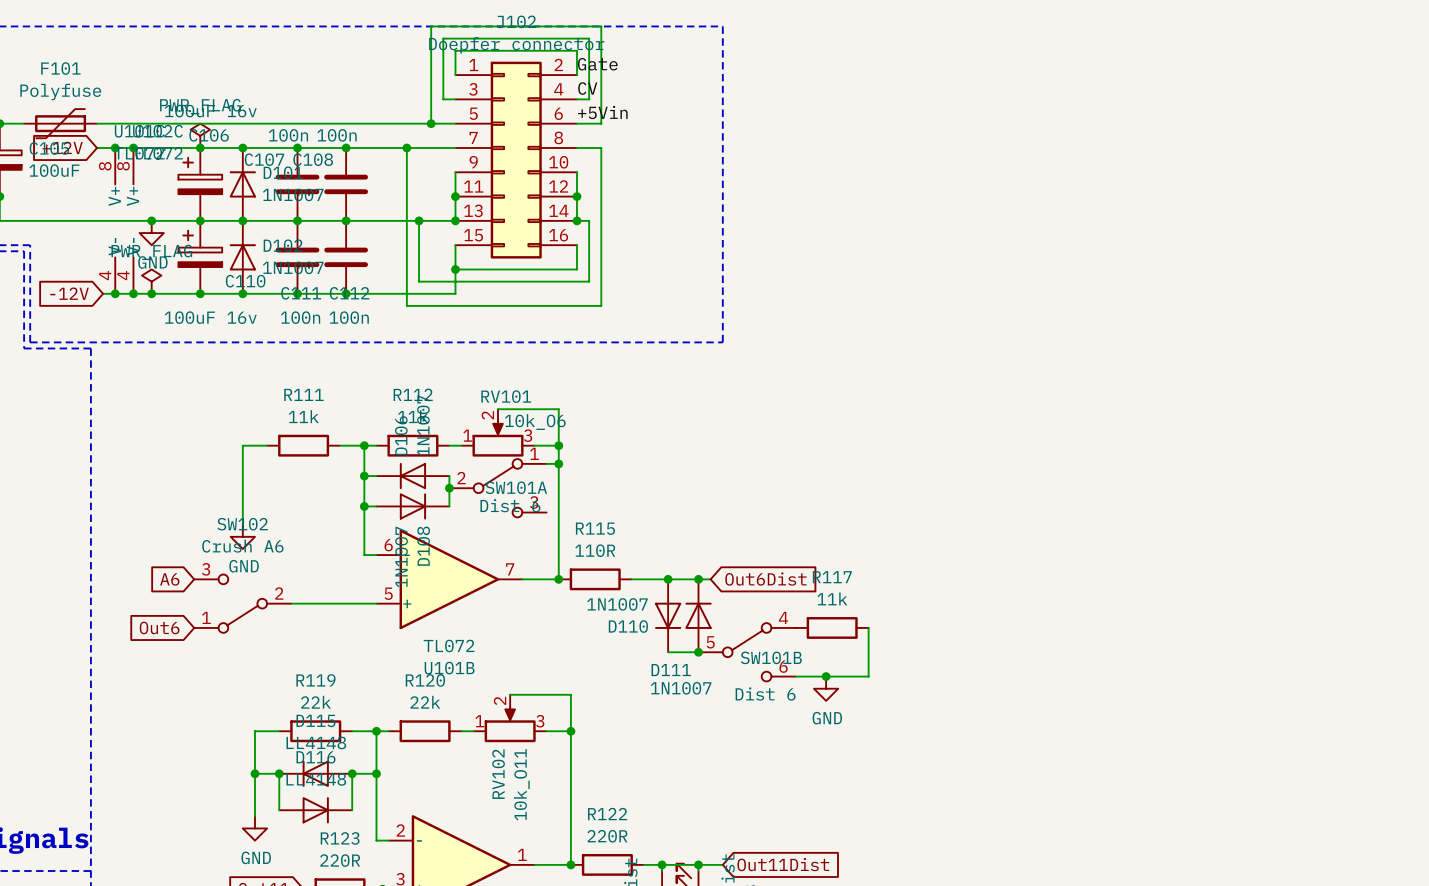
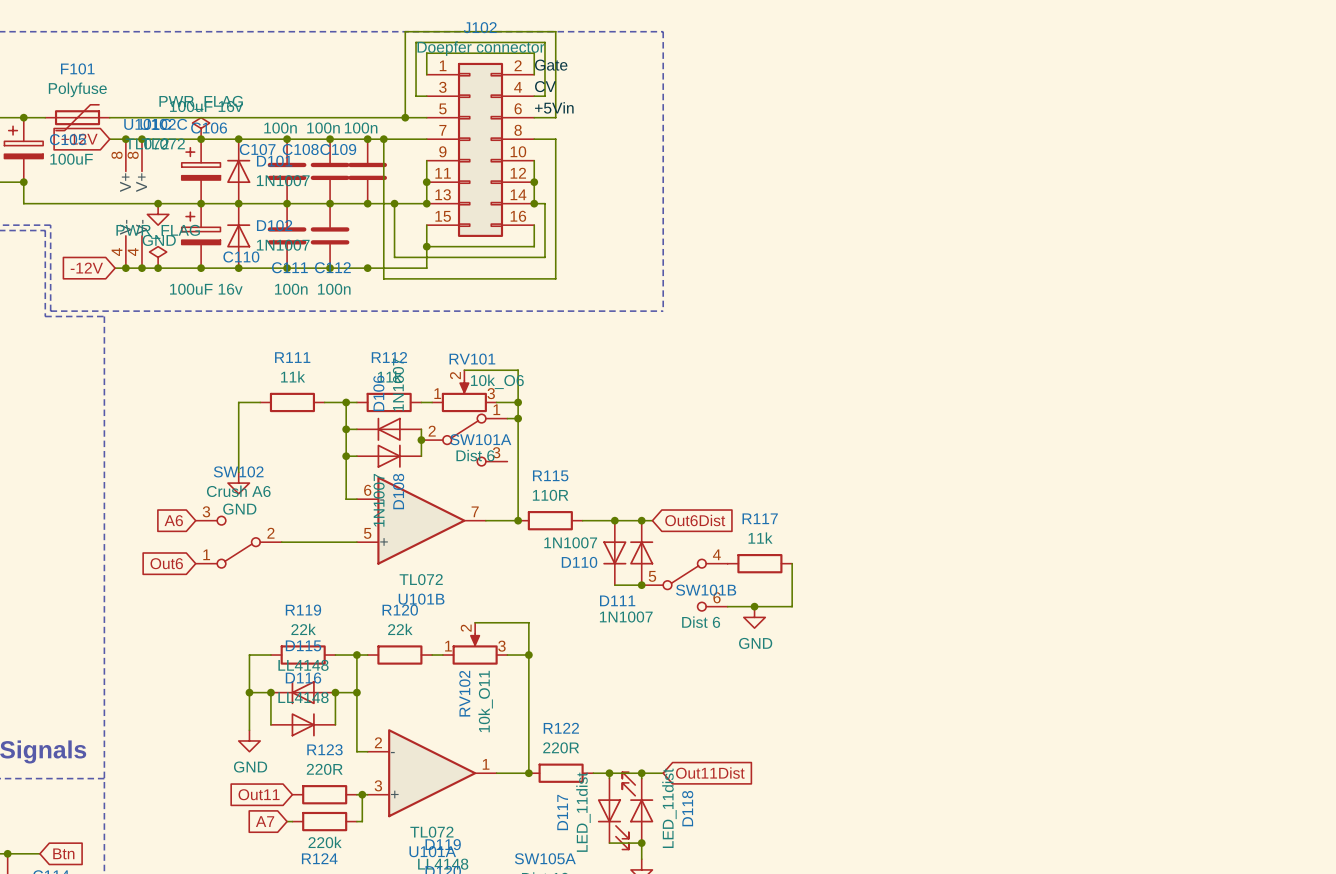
junction: none -> (367, 139)
C109: none -> 100n (367, 171)
junction: none -> (367, 203)
junction: none -> (367, 268)

